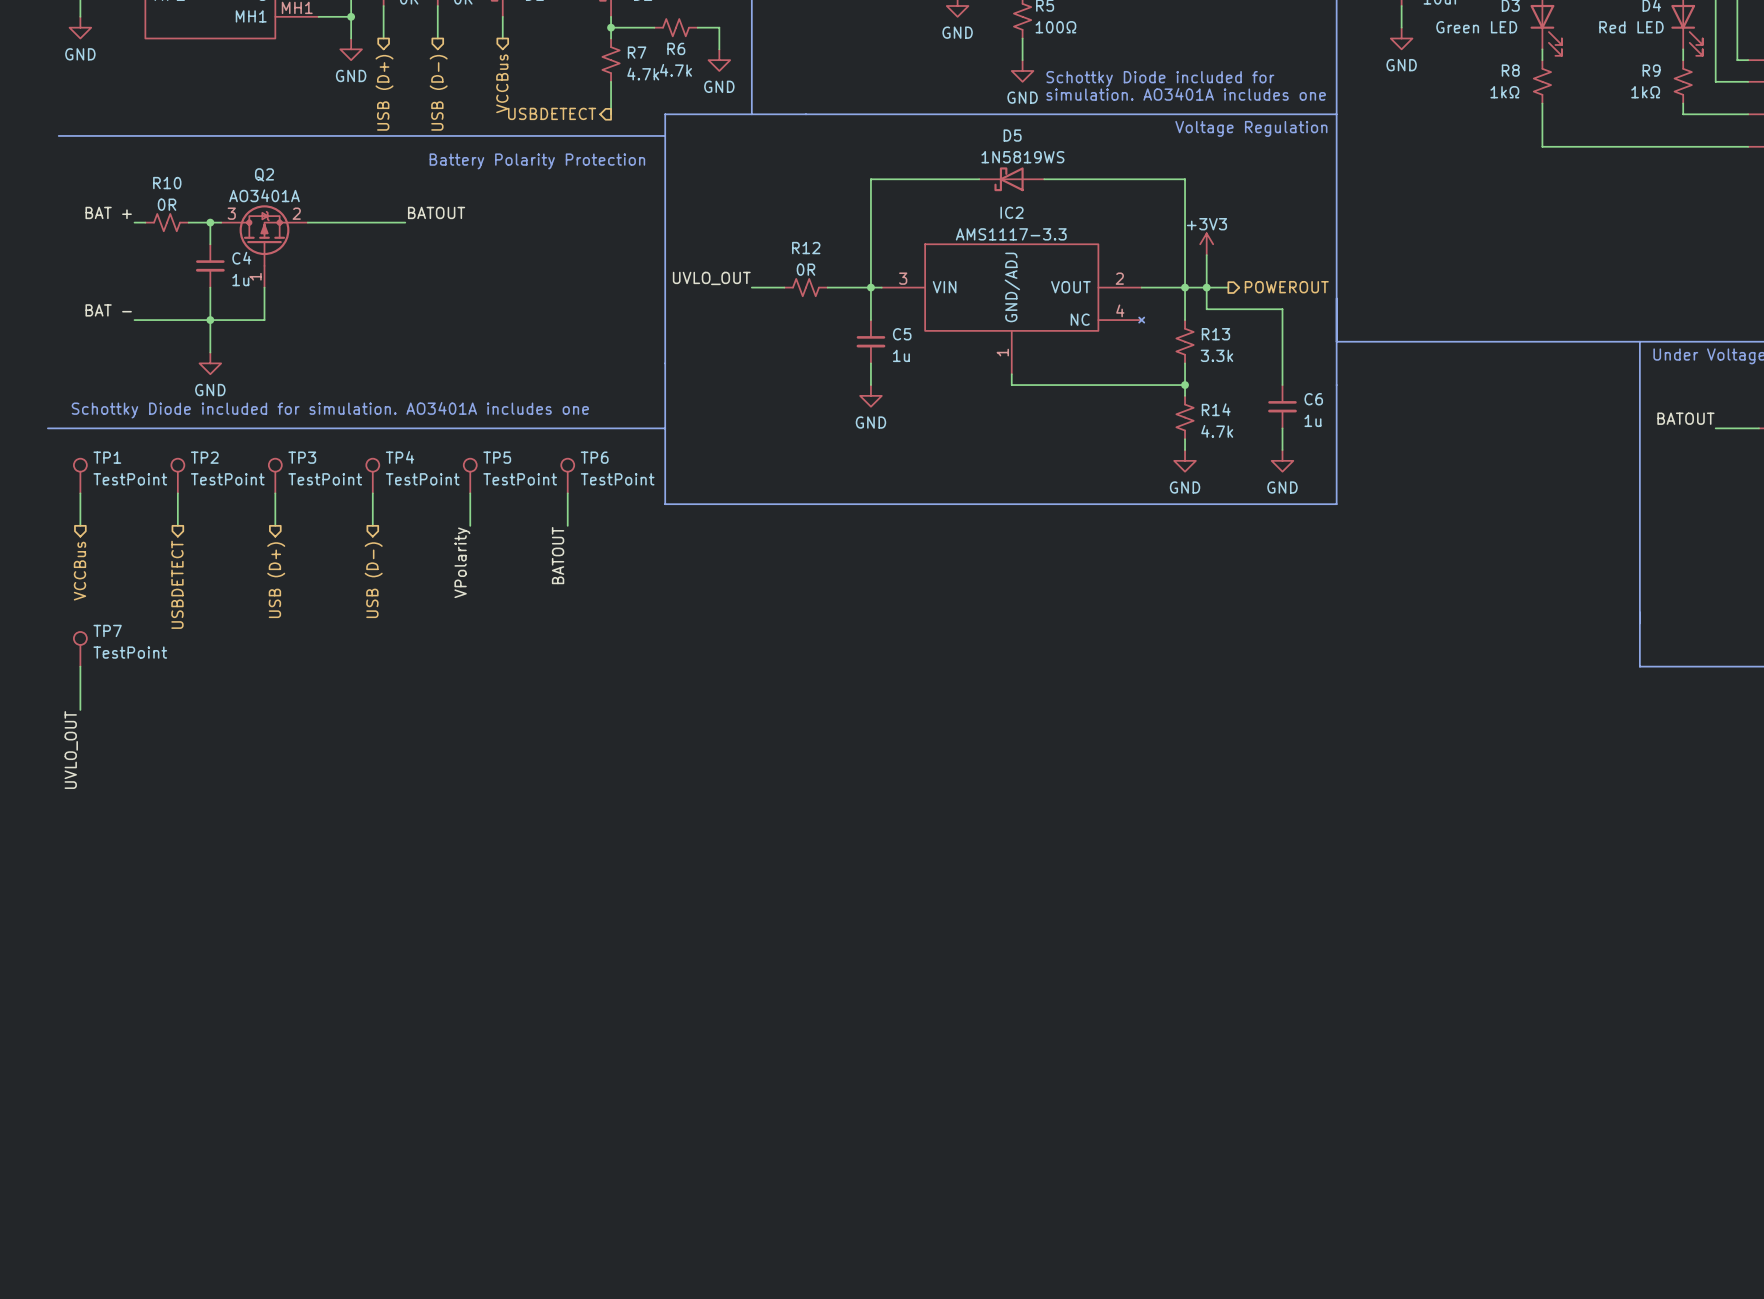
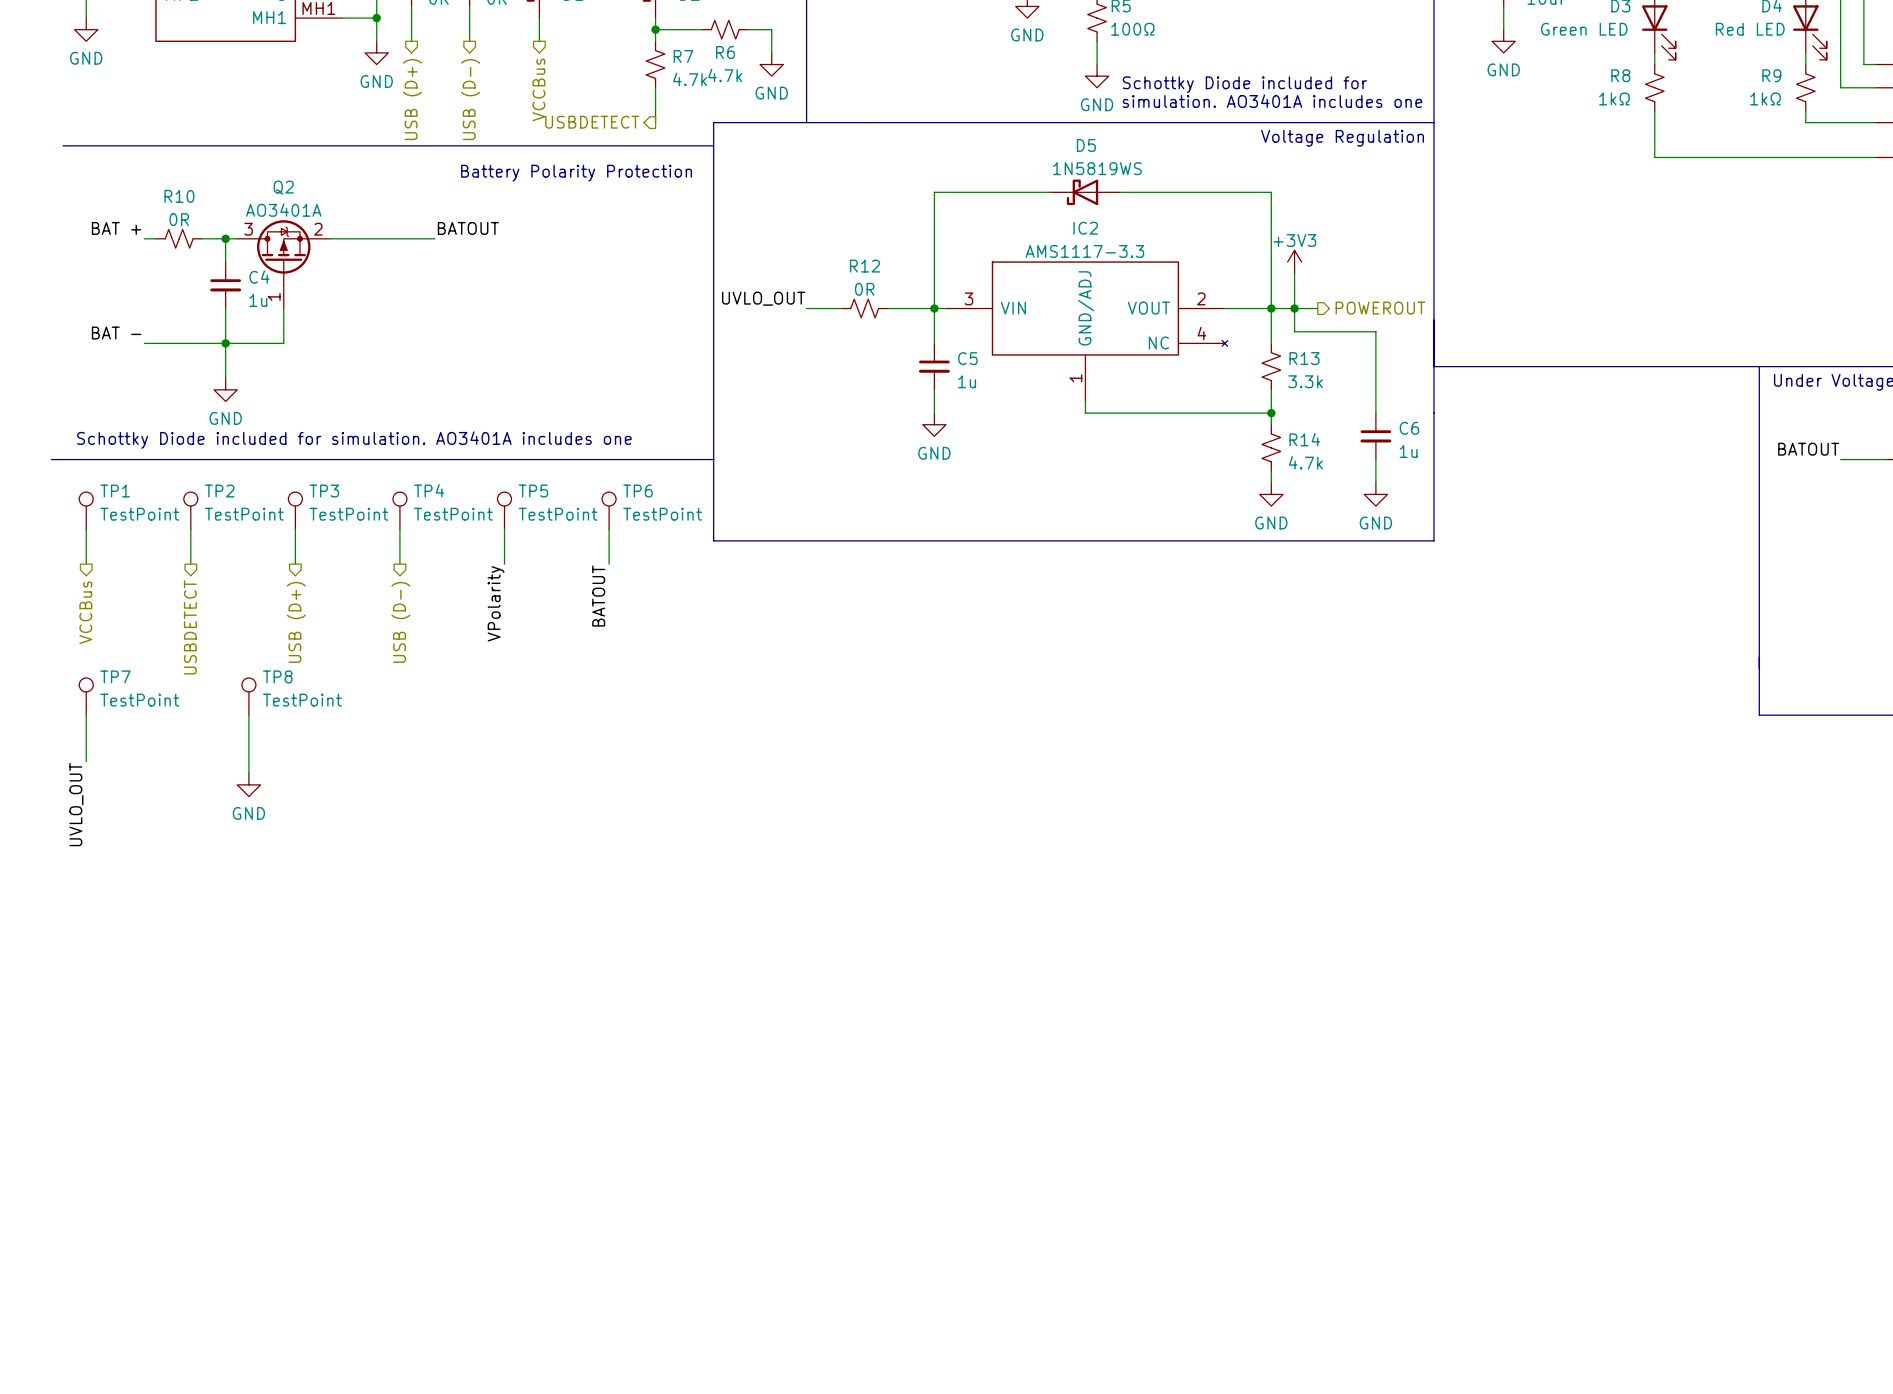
TP8: none -> TestPoint (248, 696)
wire: none -> (248, 715) (248, 773)
power symbol: none -> GND (248, 784)

